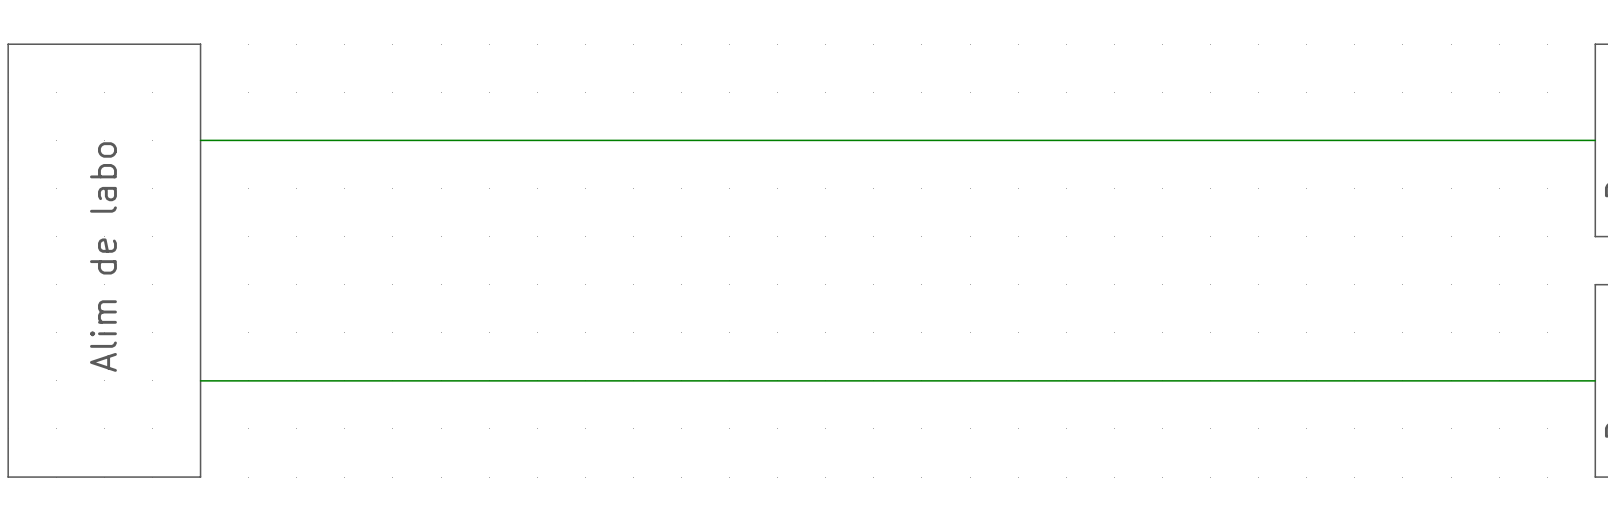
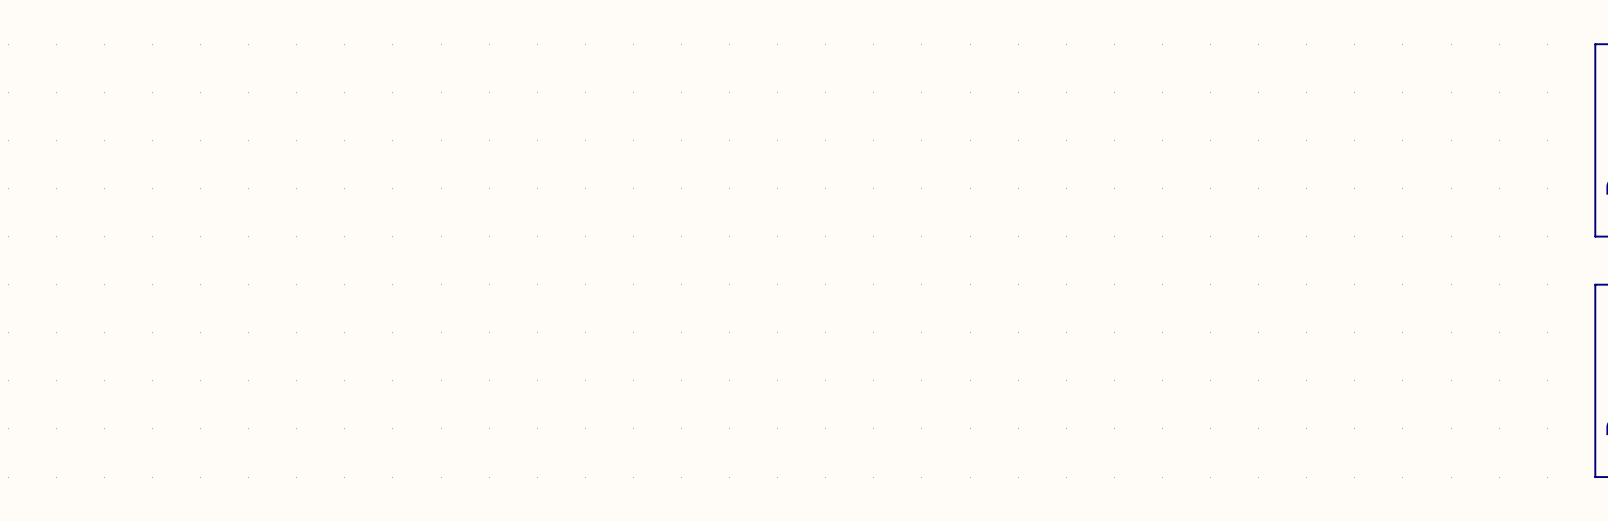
line: (8, 44) (200, 44) (200, 477) (8, 477) (8, 44) -> none
wire: (200, 140) (1595, 140) -> none
text: Alim de labo (103, 257) -> none
wire: (200, 380) (1595, 380) -> none

